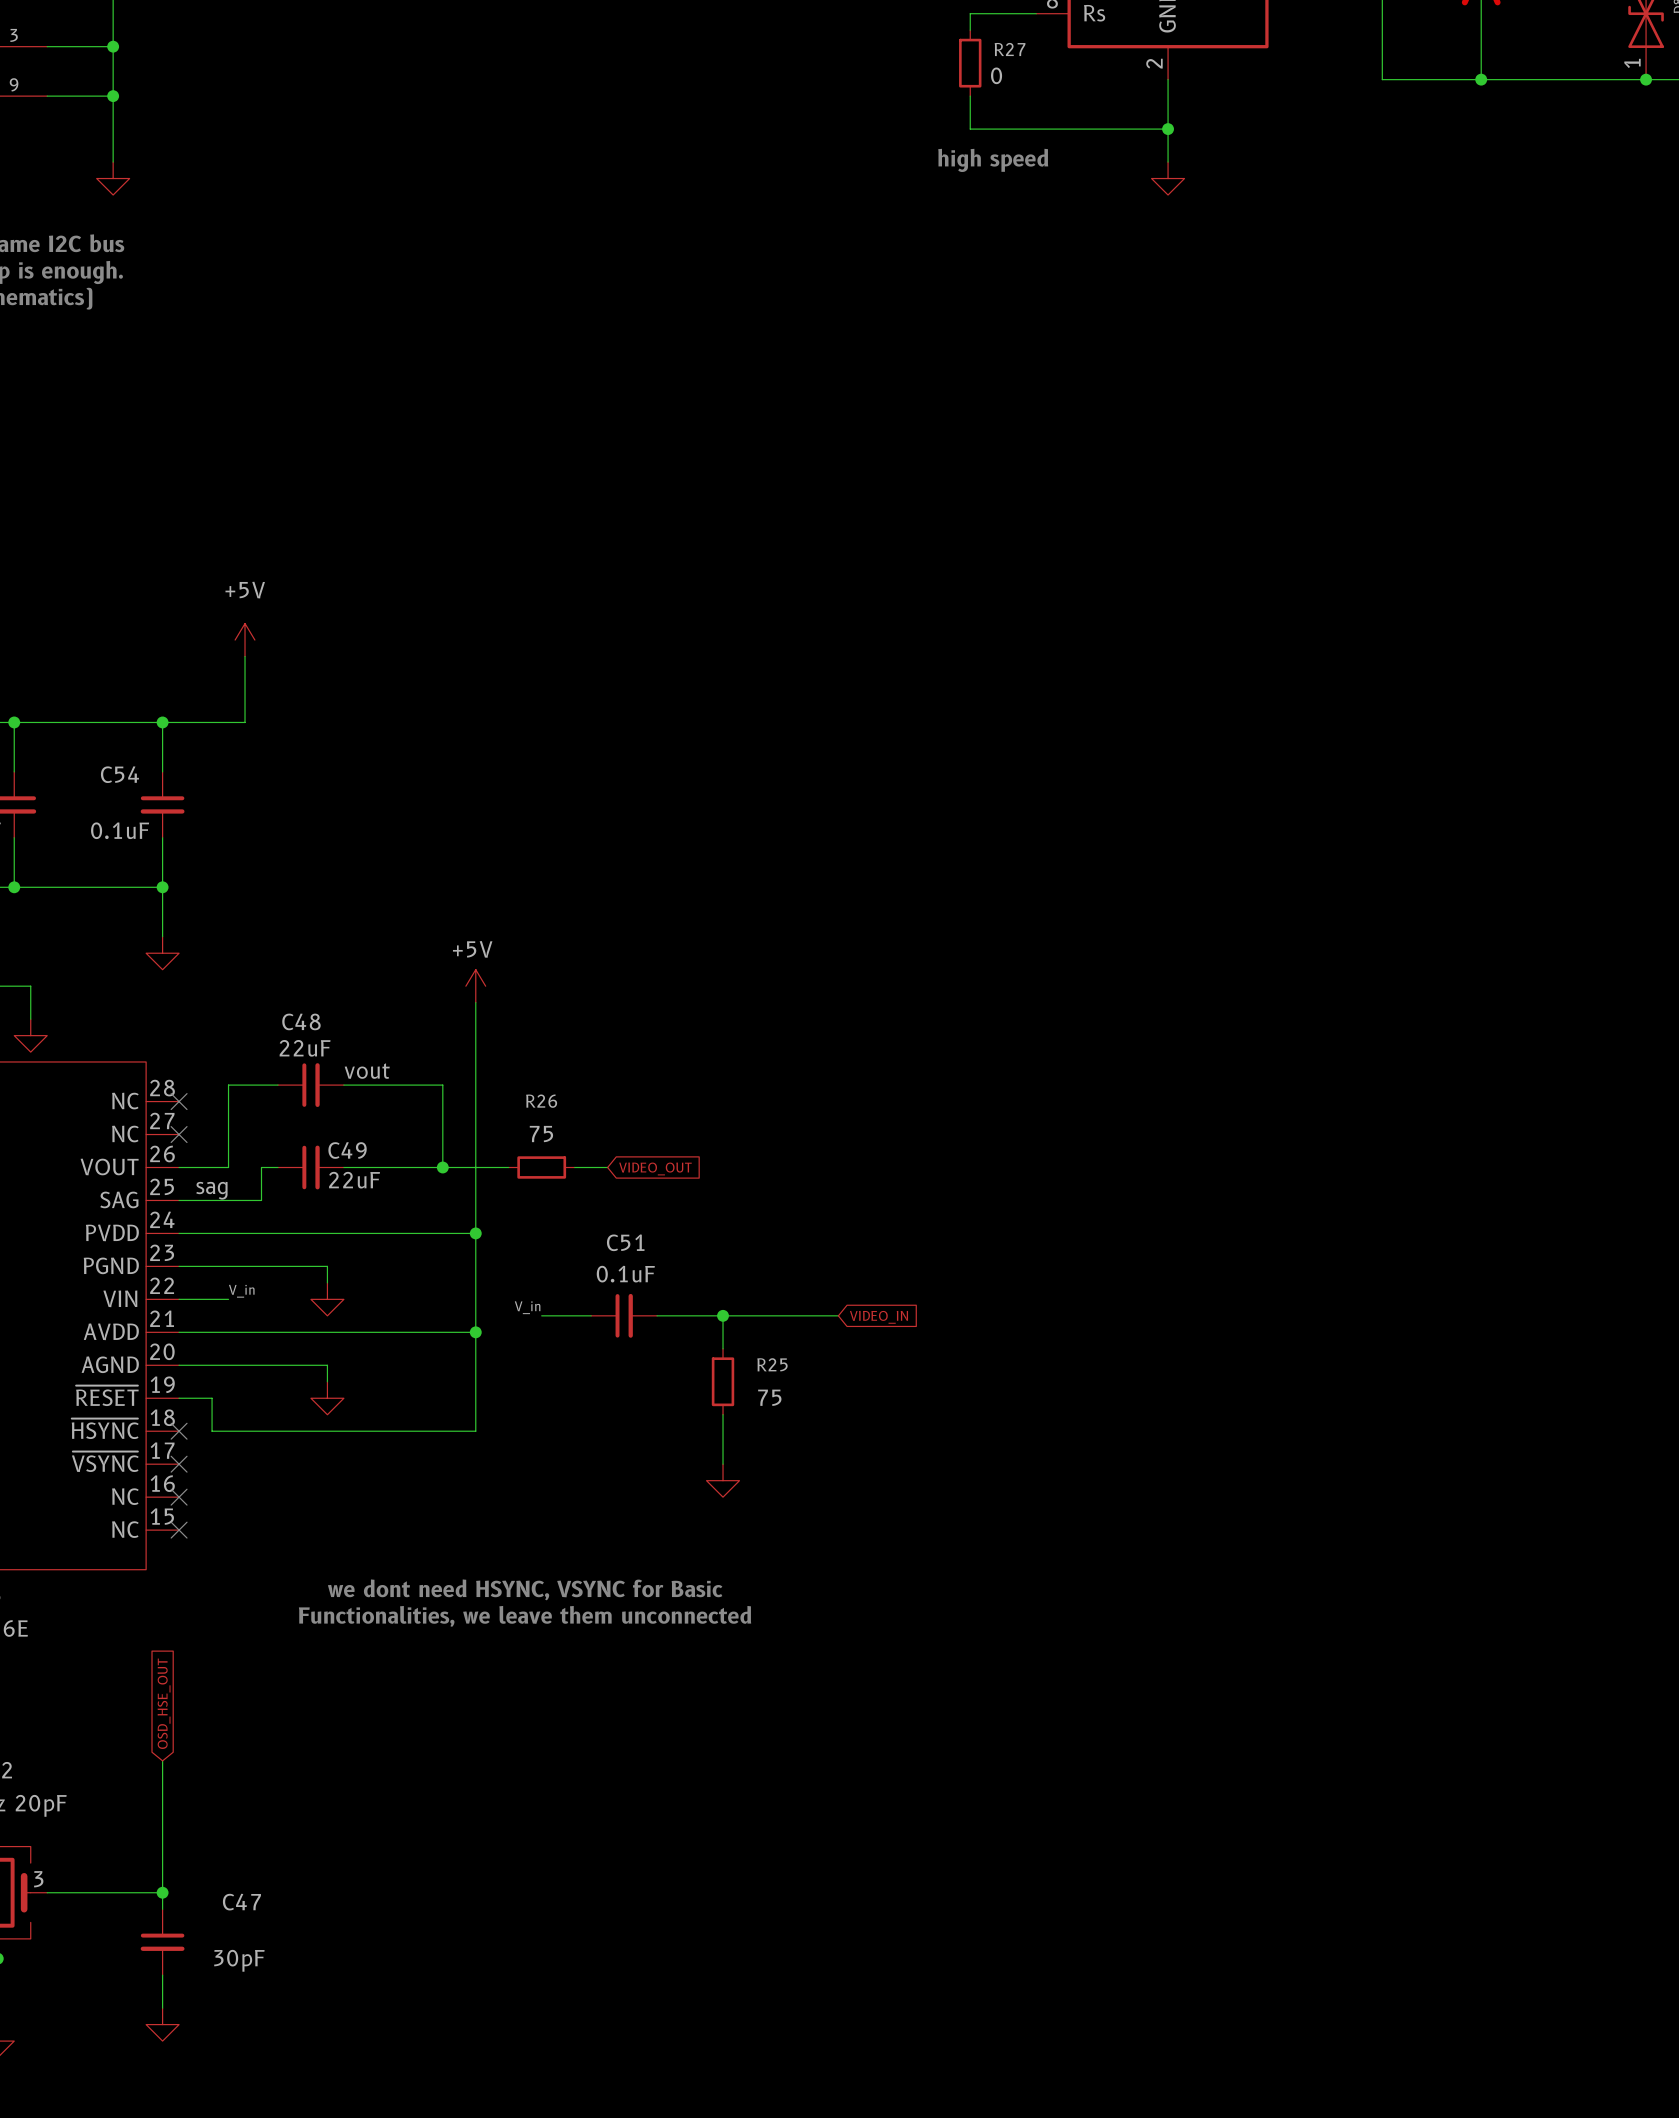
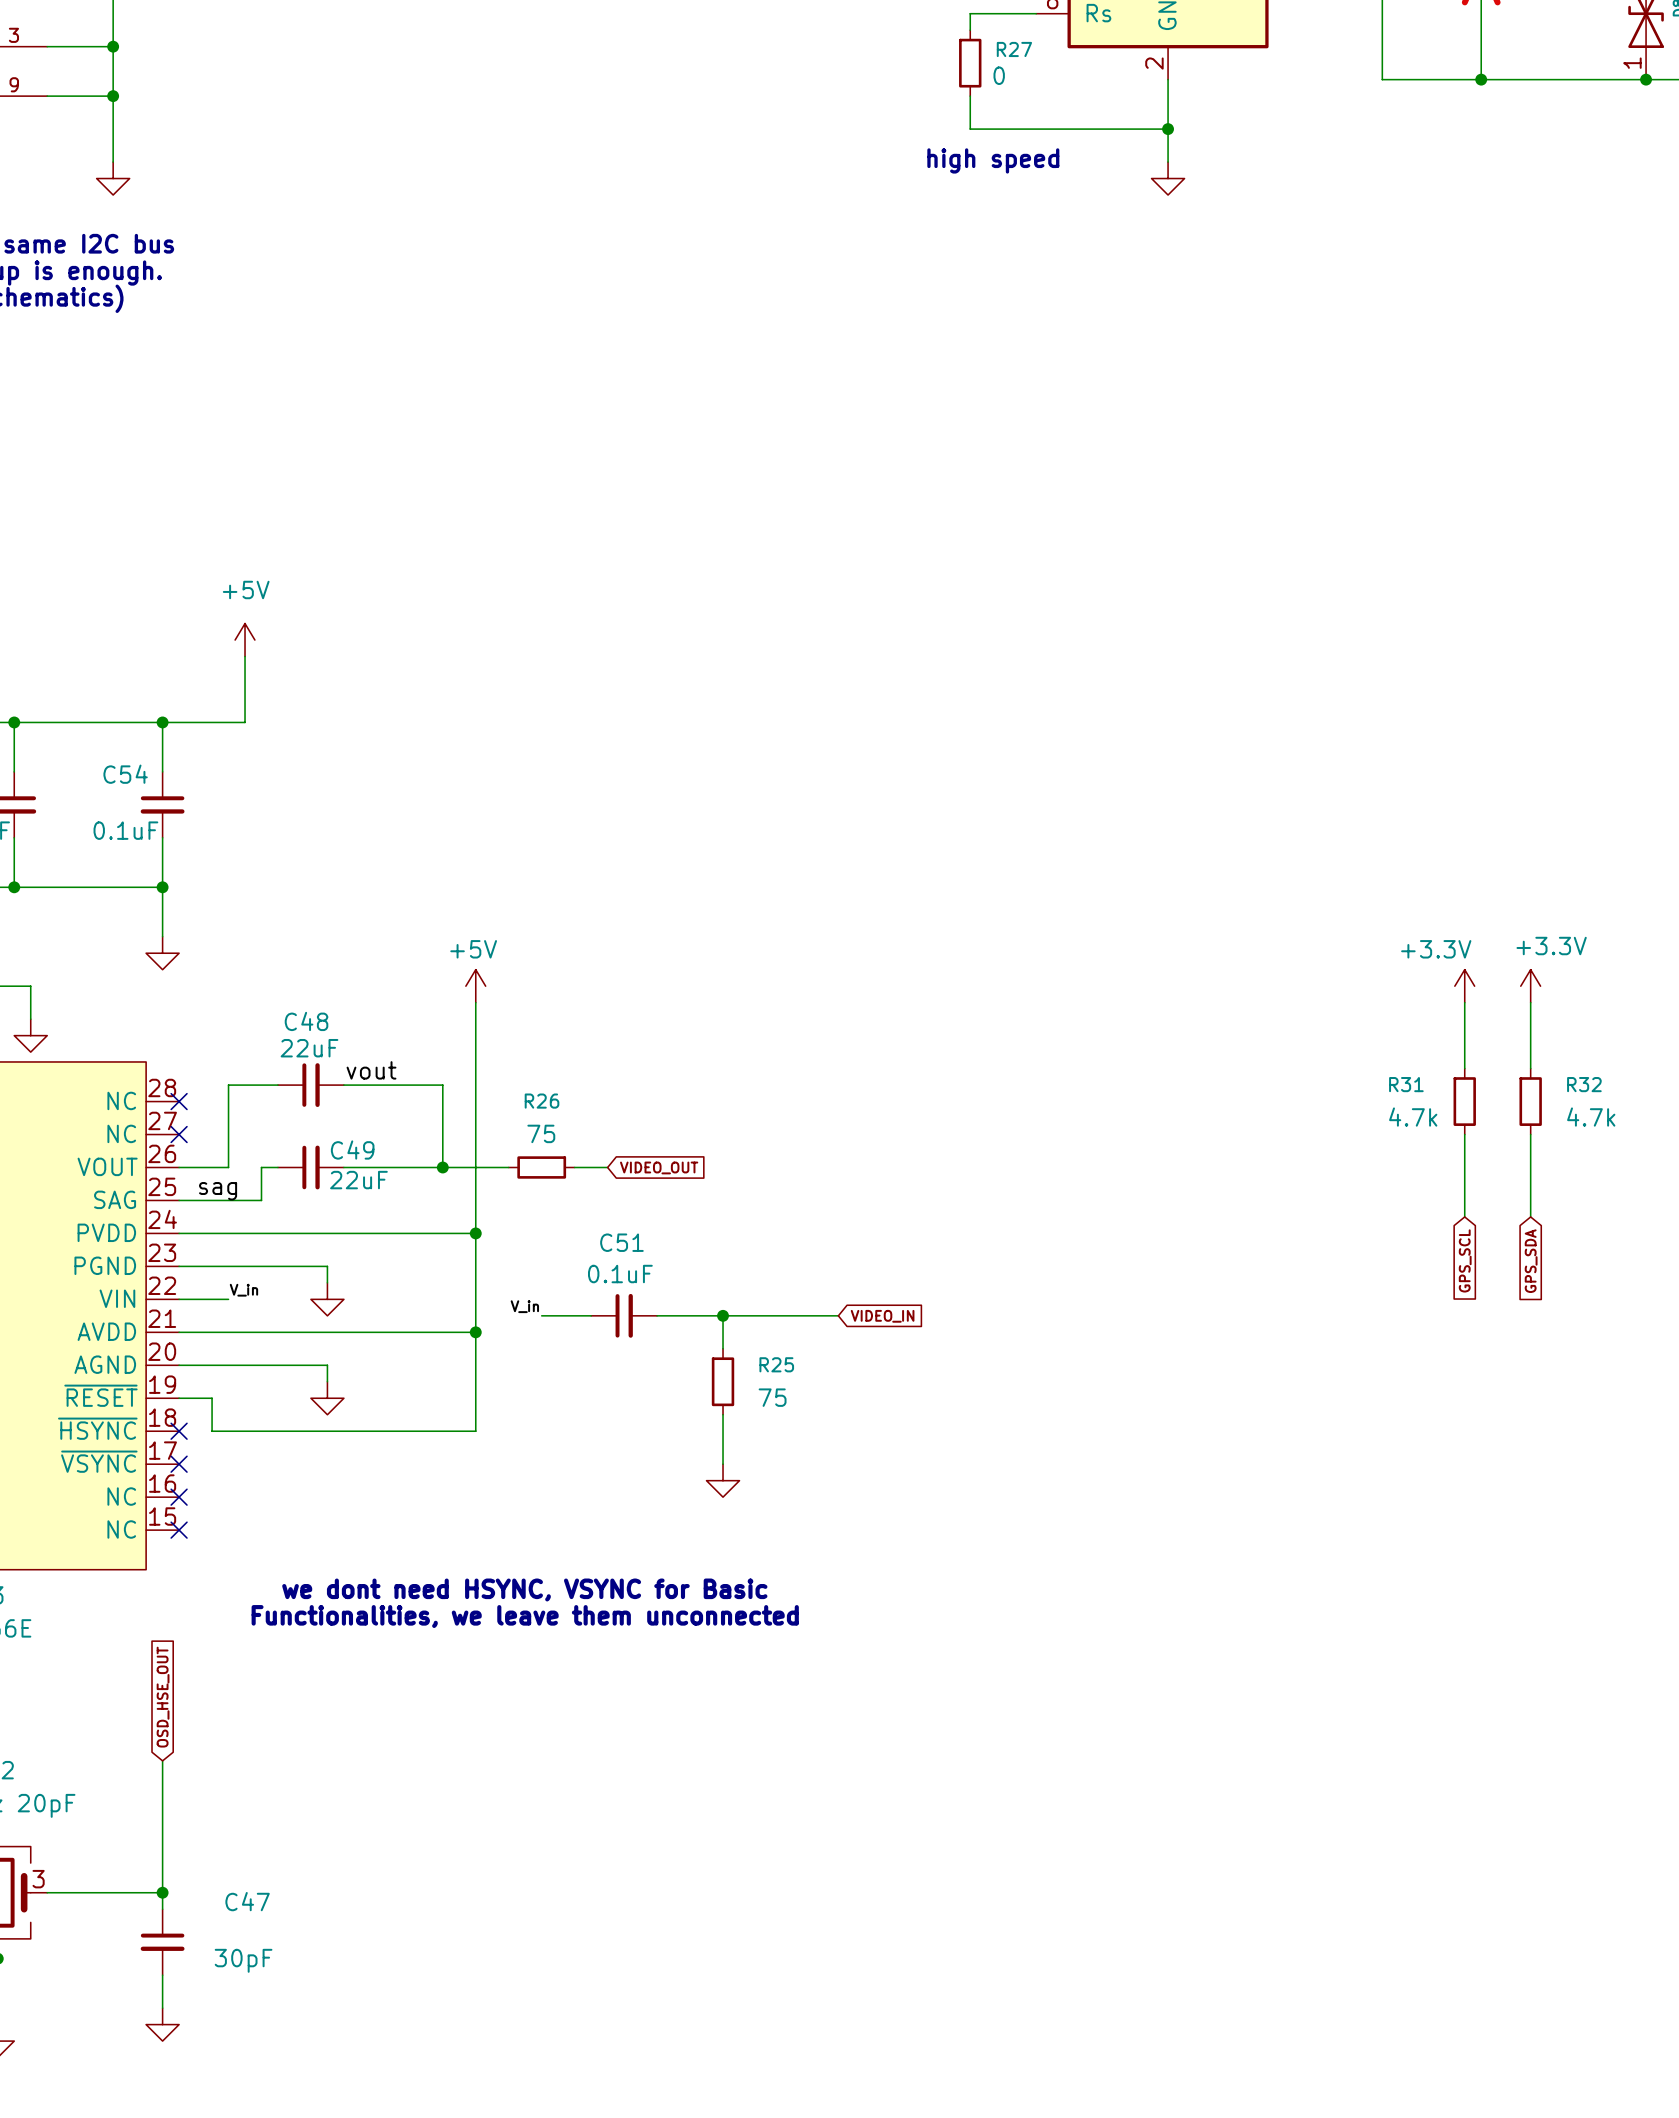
power symbol: none -> +3.3V (1464, 986)
power symbol: none -> +3.3V (1530, 986)
wire: none -> (1464, 1002) (1464, 1068)
wire: none -> (1530, 1002) (1530, 1068)
R31: none -> 4.7k (1464, 1101)
R32: none -> 4.7k (1530, 1101)
wire: none -> (1464, 1134) (1464, 1216)
wire: none -> (1530, 1134) (1530, 1216)
global label: none -> GPS_SCL (1465, 1260)
global label: none -> GPS_SDA (1531, 1261)

